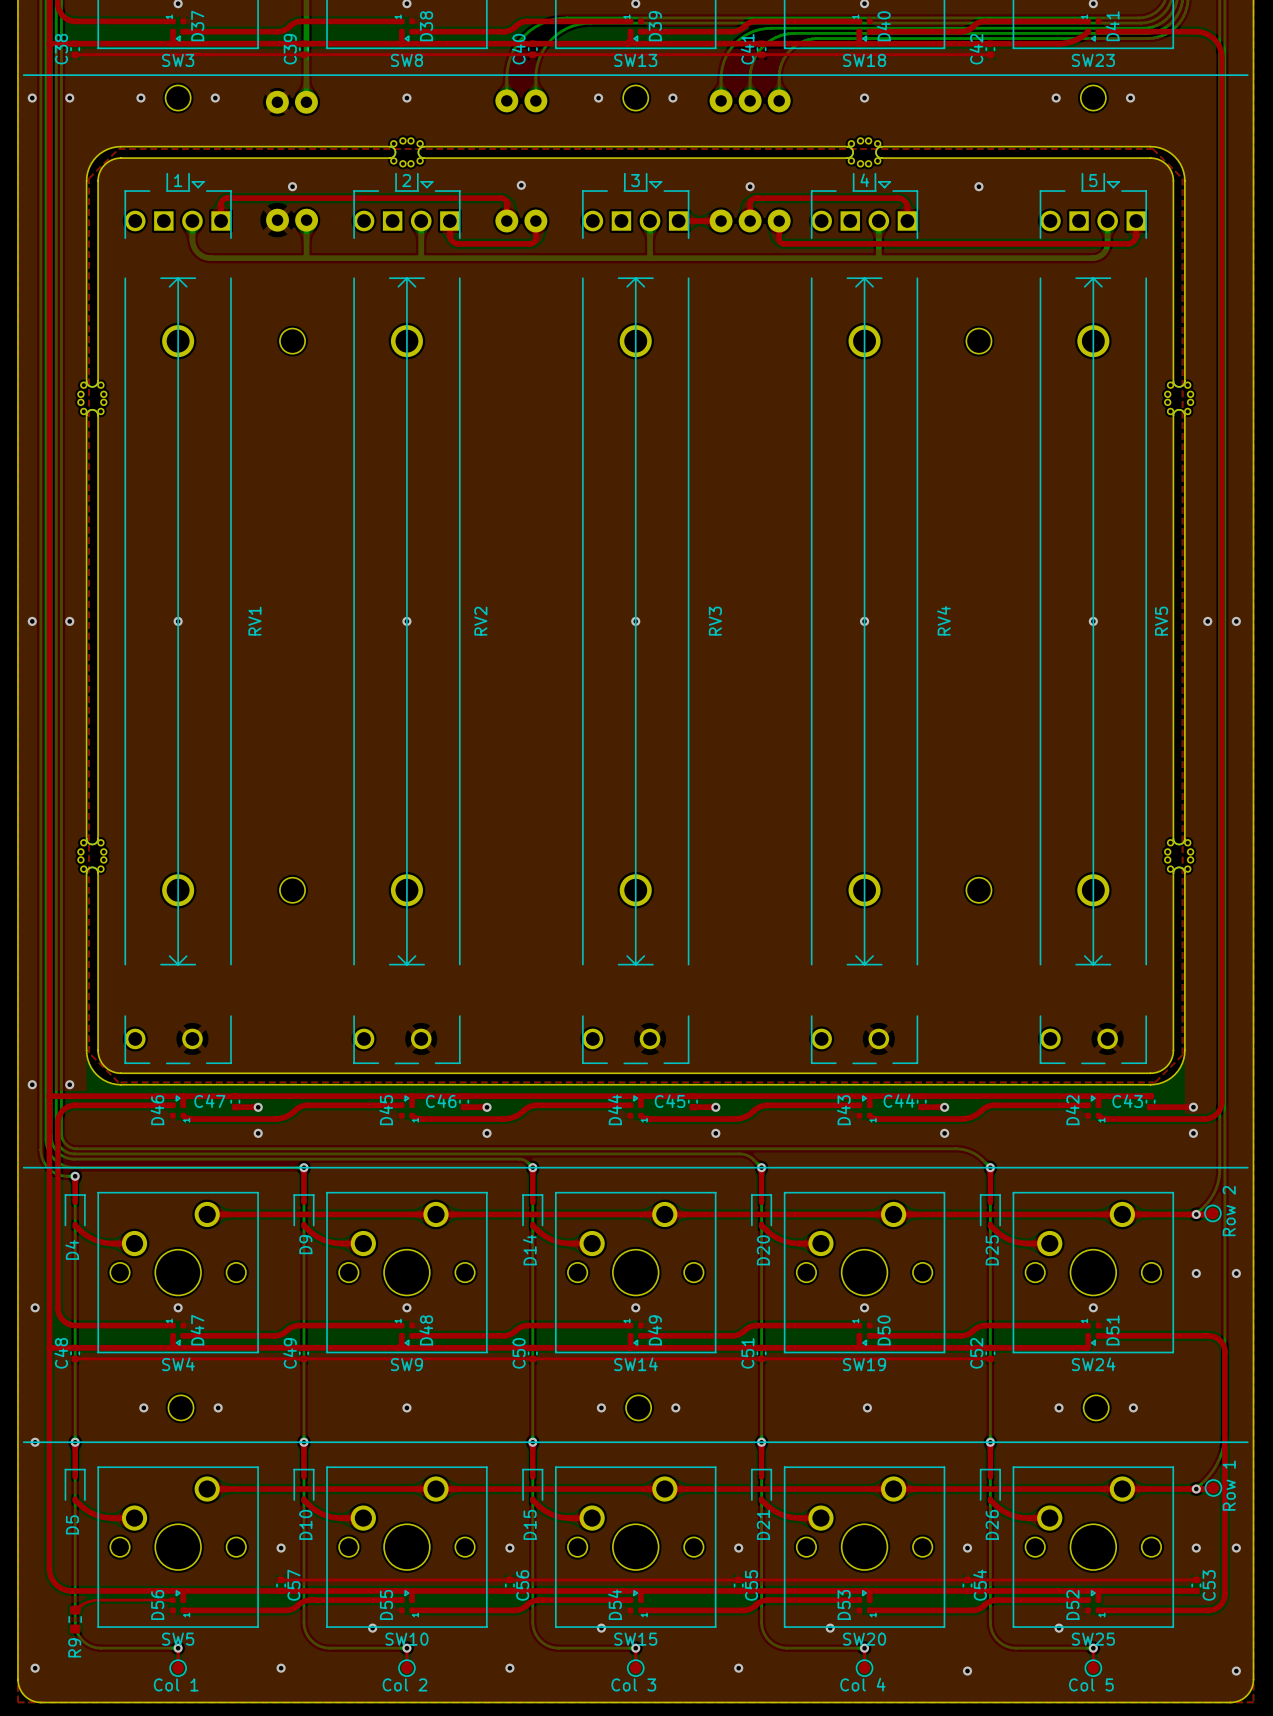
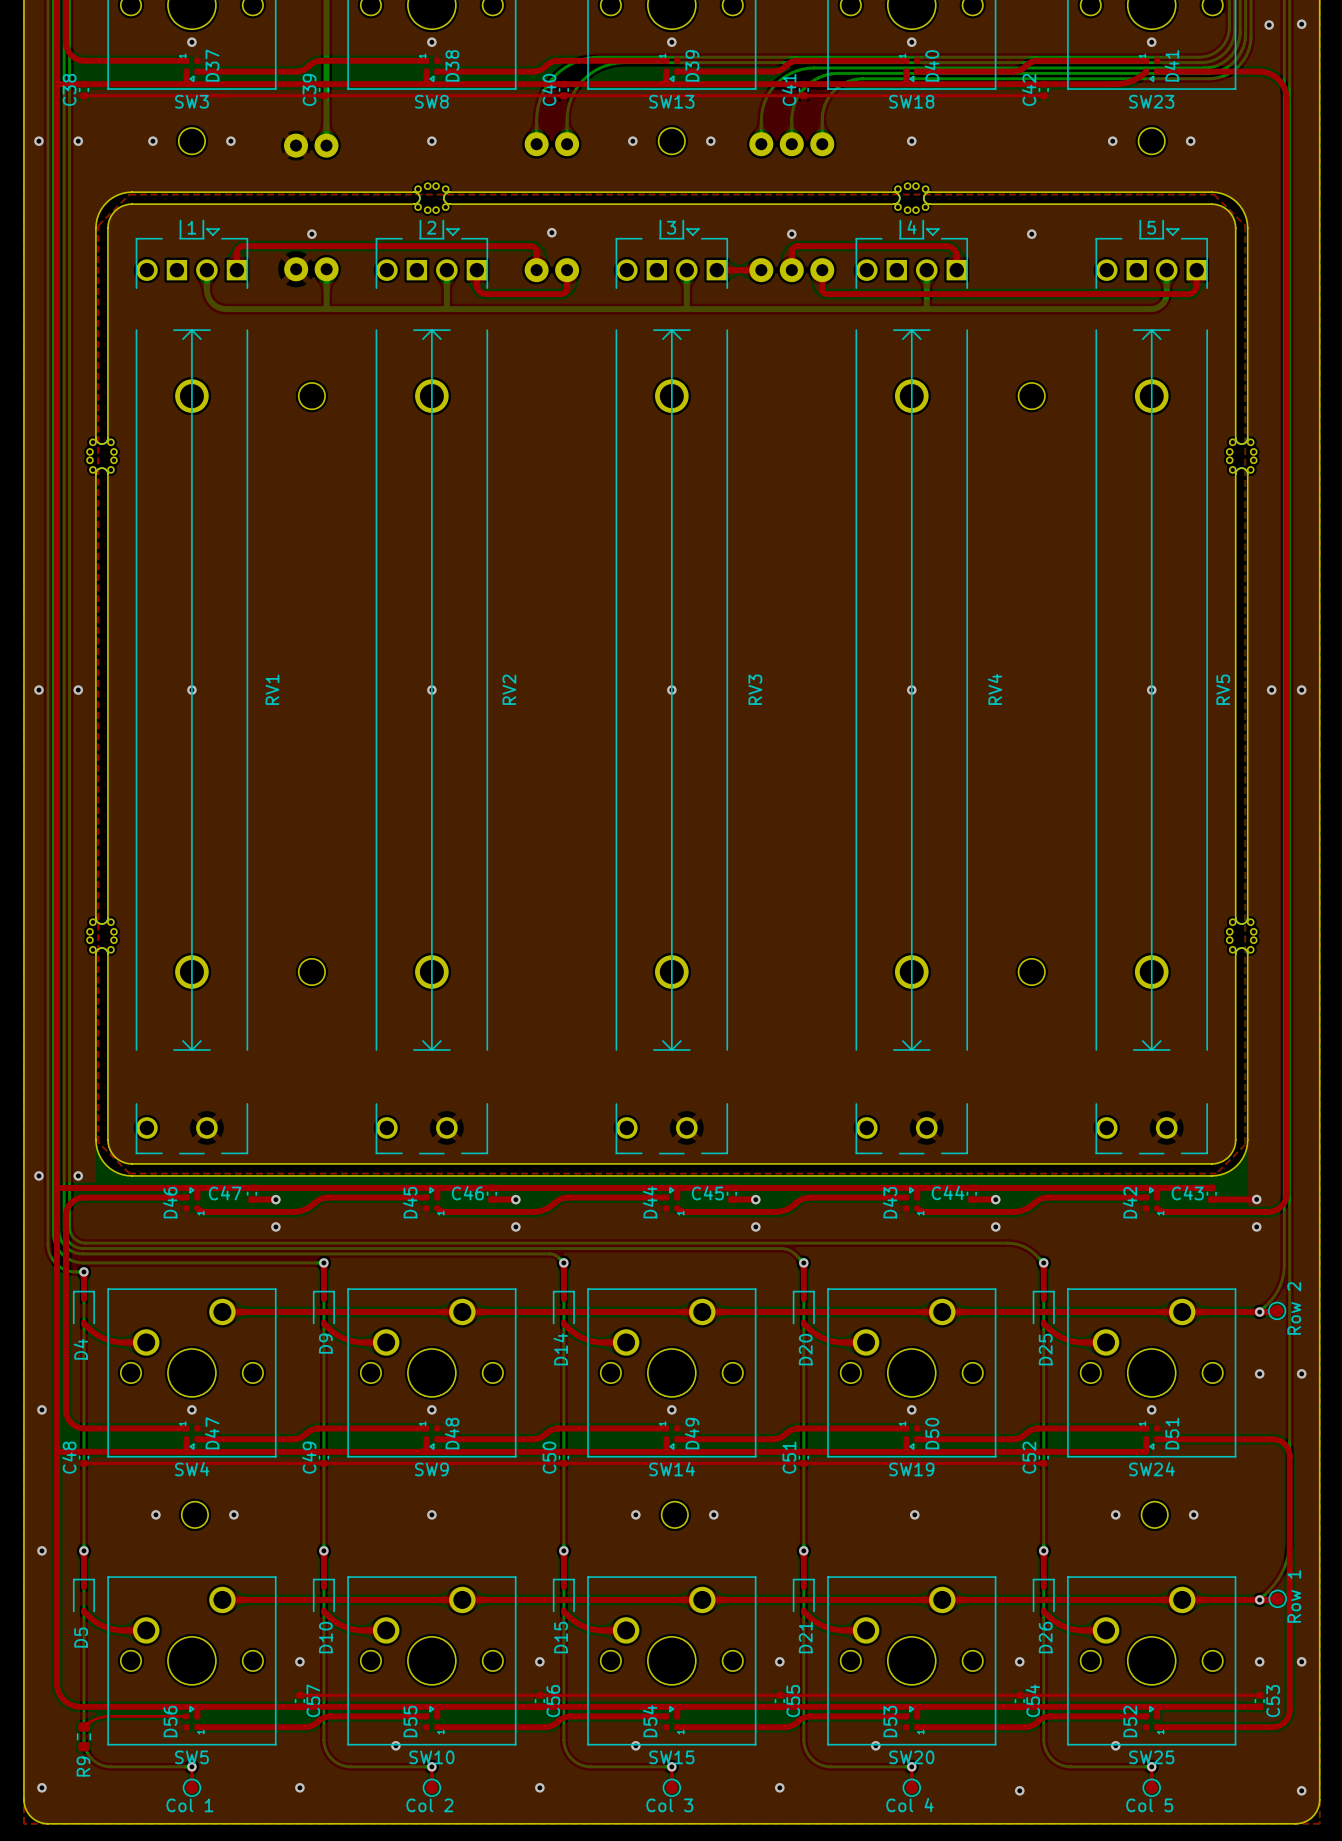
line: (23, 75) (1247, 75) -> none
line: (23, 1167) (1247, 1167) -> none
line: (23, 1442) (1247, 1442) -> none

